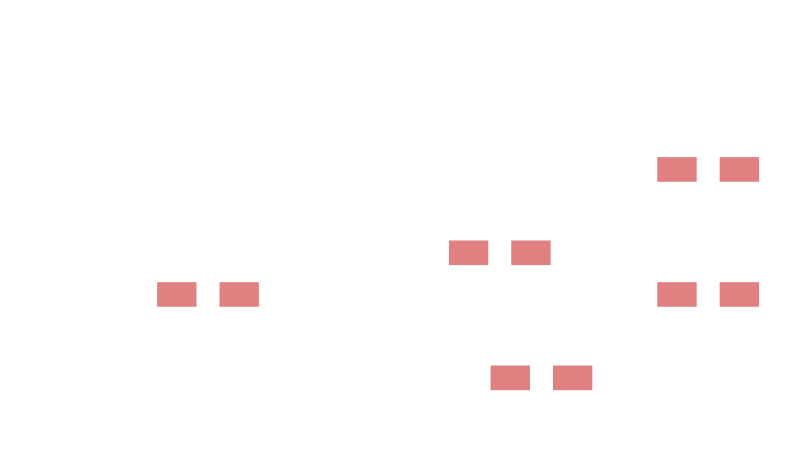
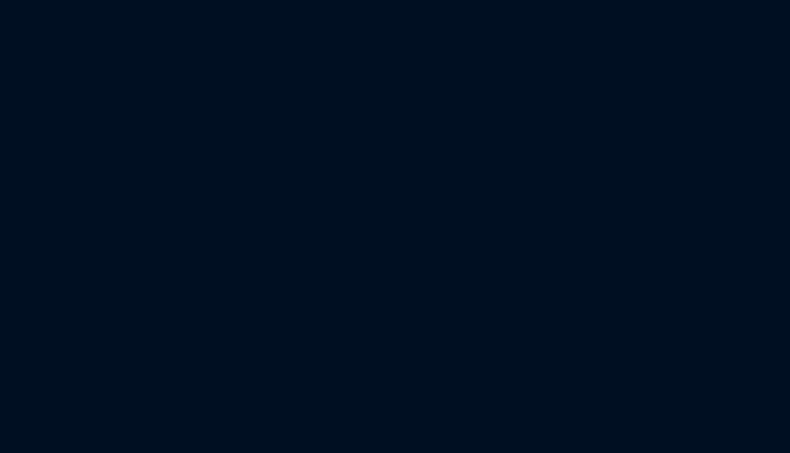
part: (708, 169) -> none
part: (499, 252) -> none
part: (208, 294) -> none
part: (708, 294) -> none
part: (541, 377) -> none

